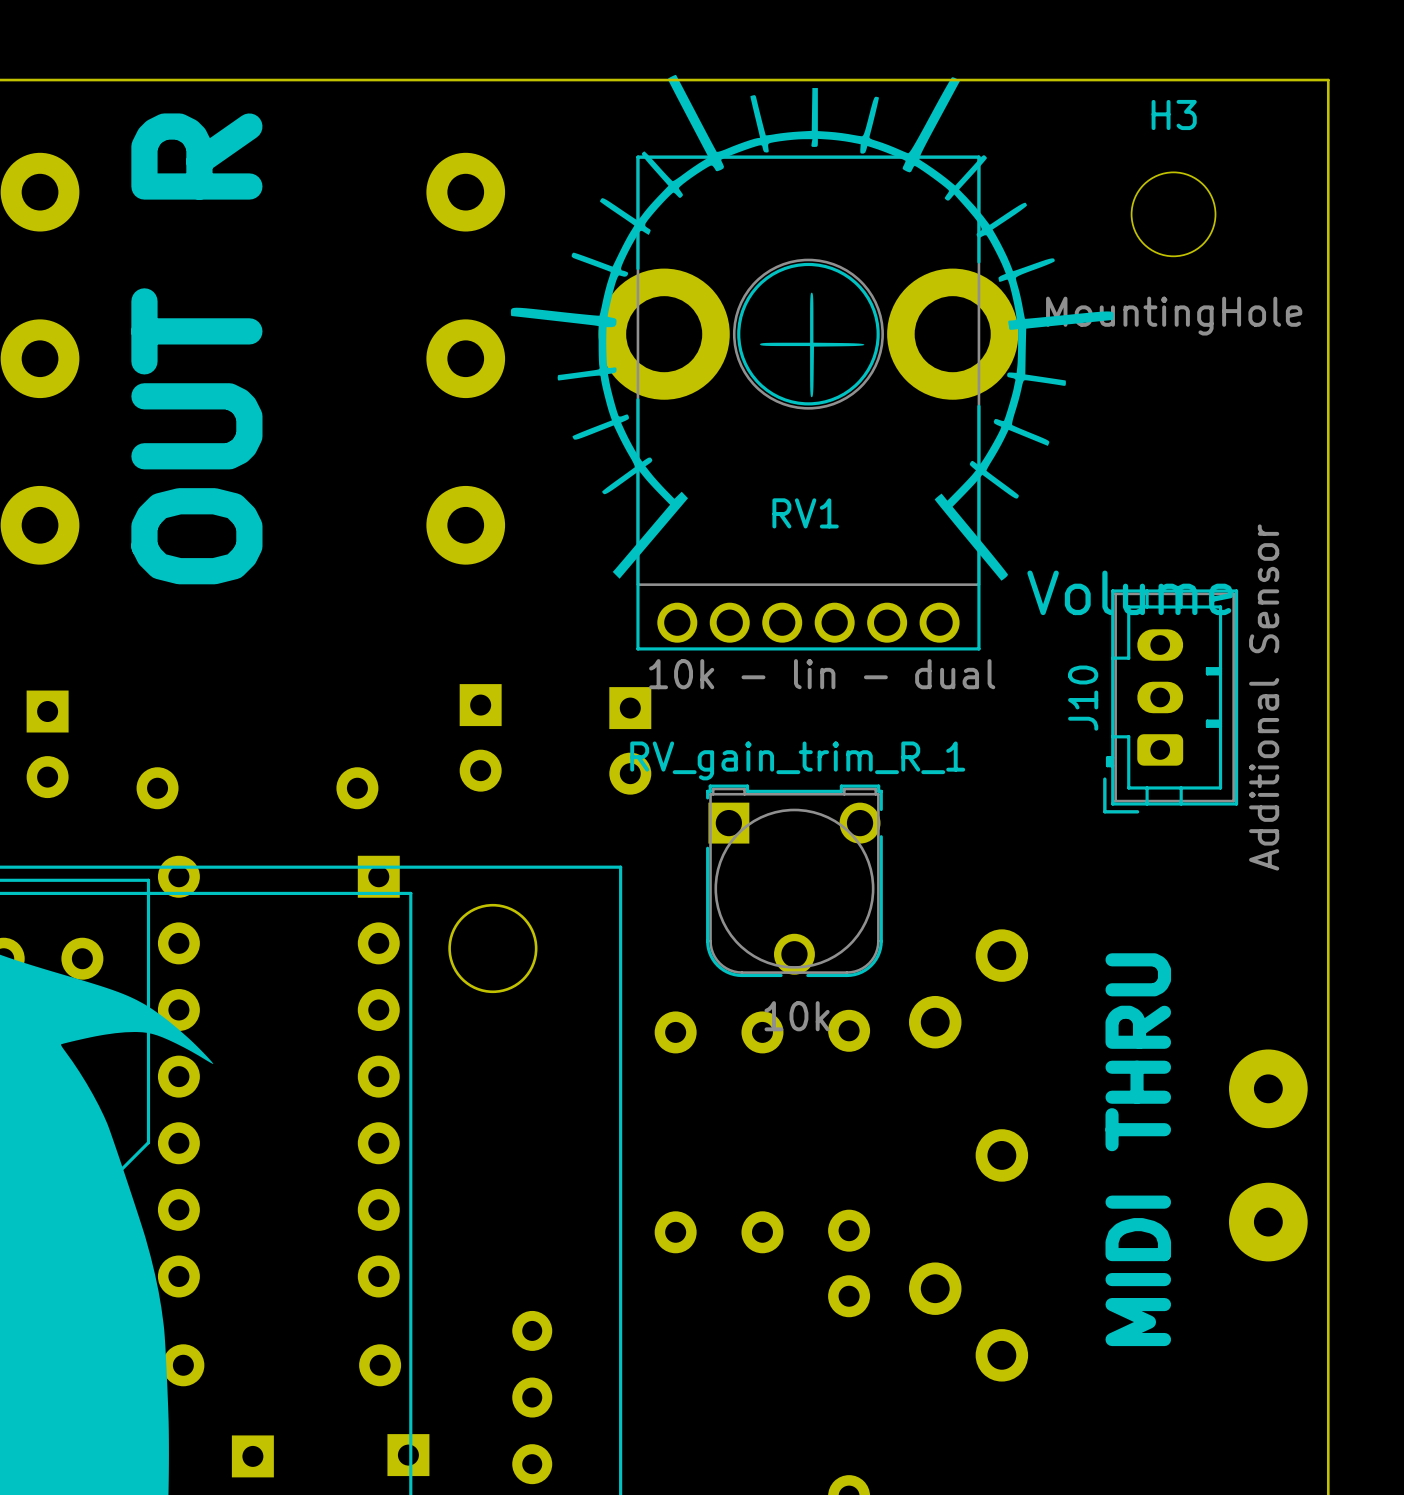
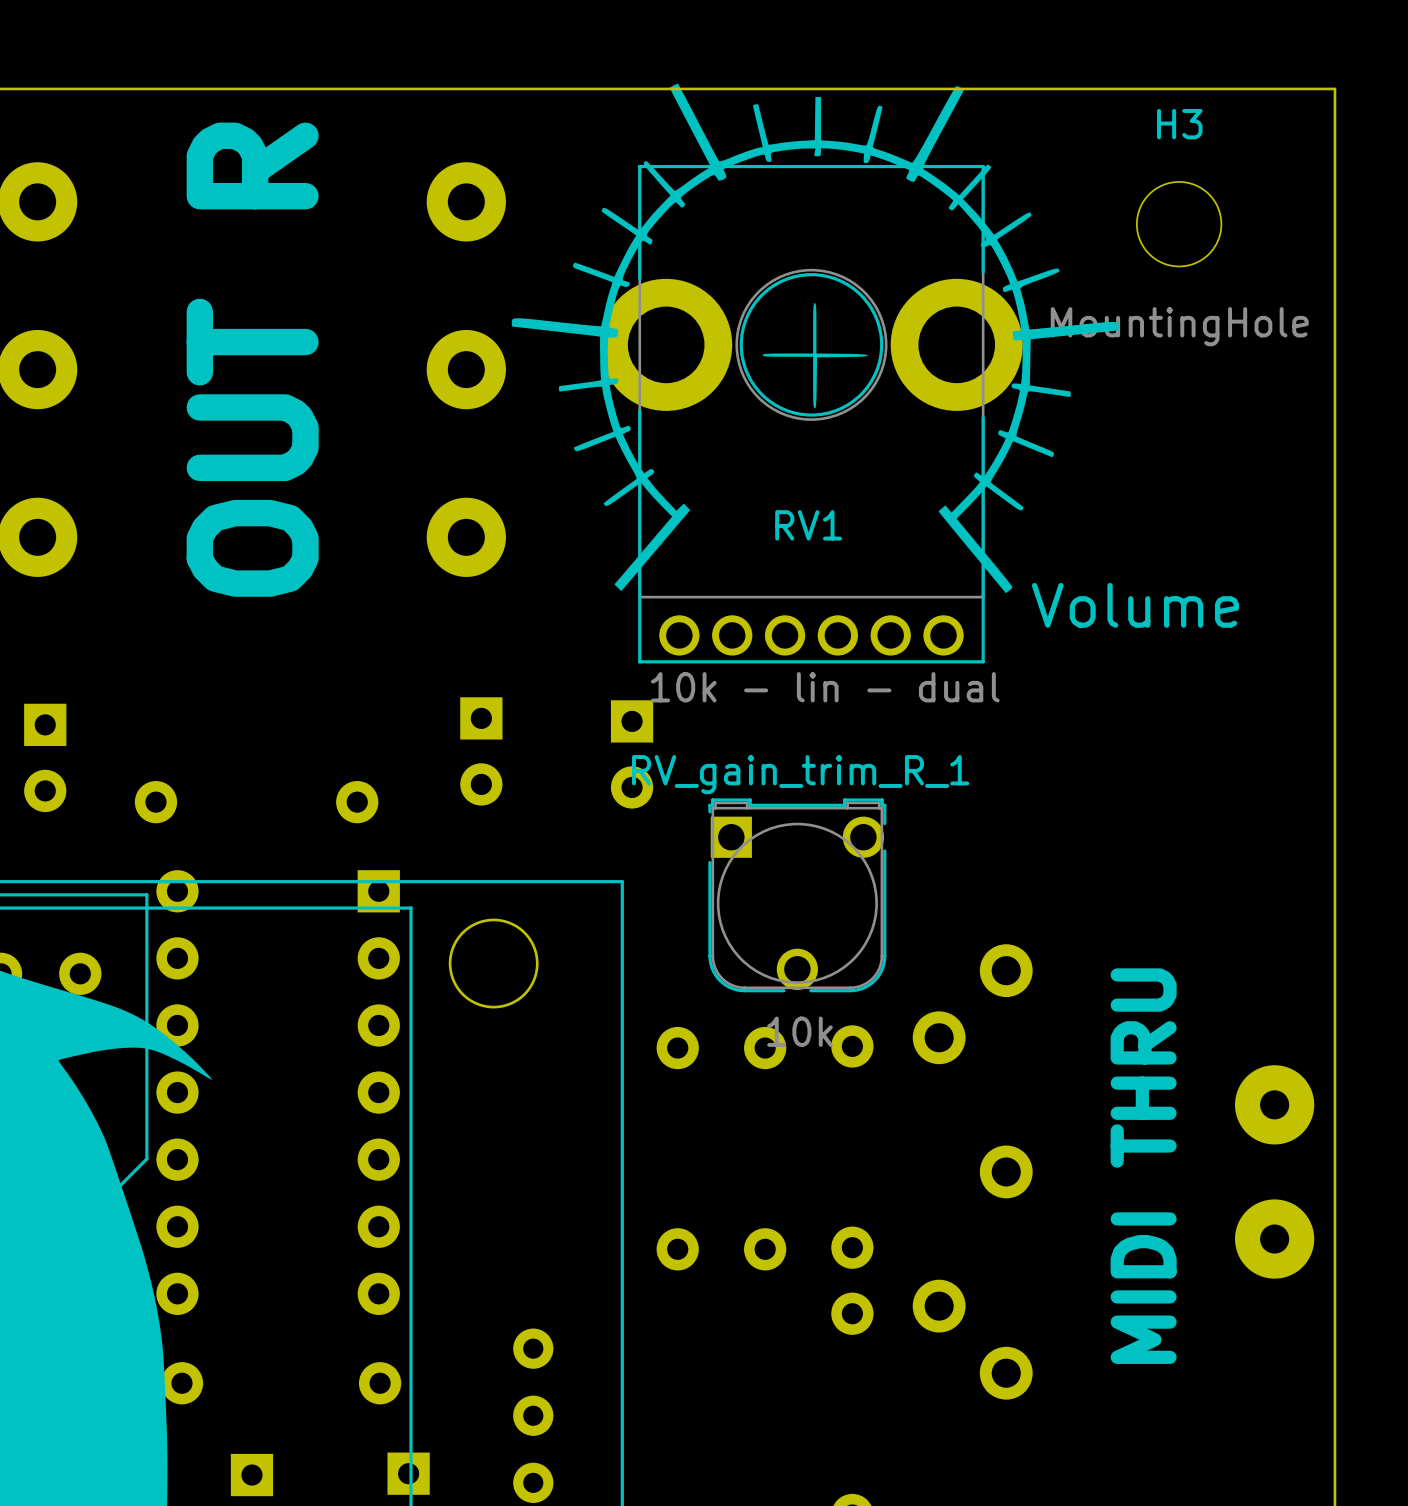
text position: OUT R (196, 348) -> OUT R (252, 359)
J10: Additional Sensor (1170, 701) -> none

